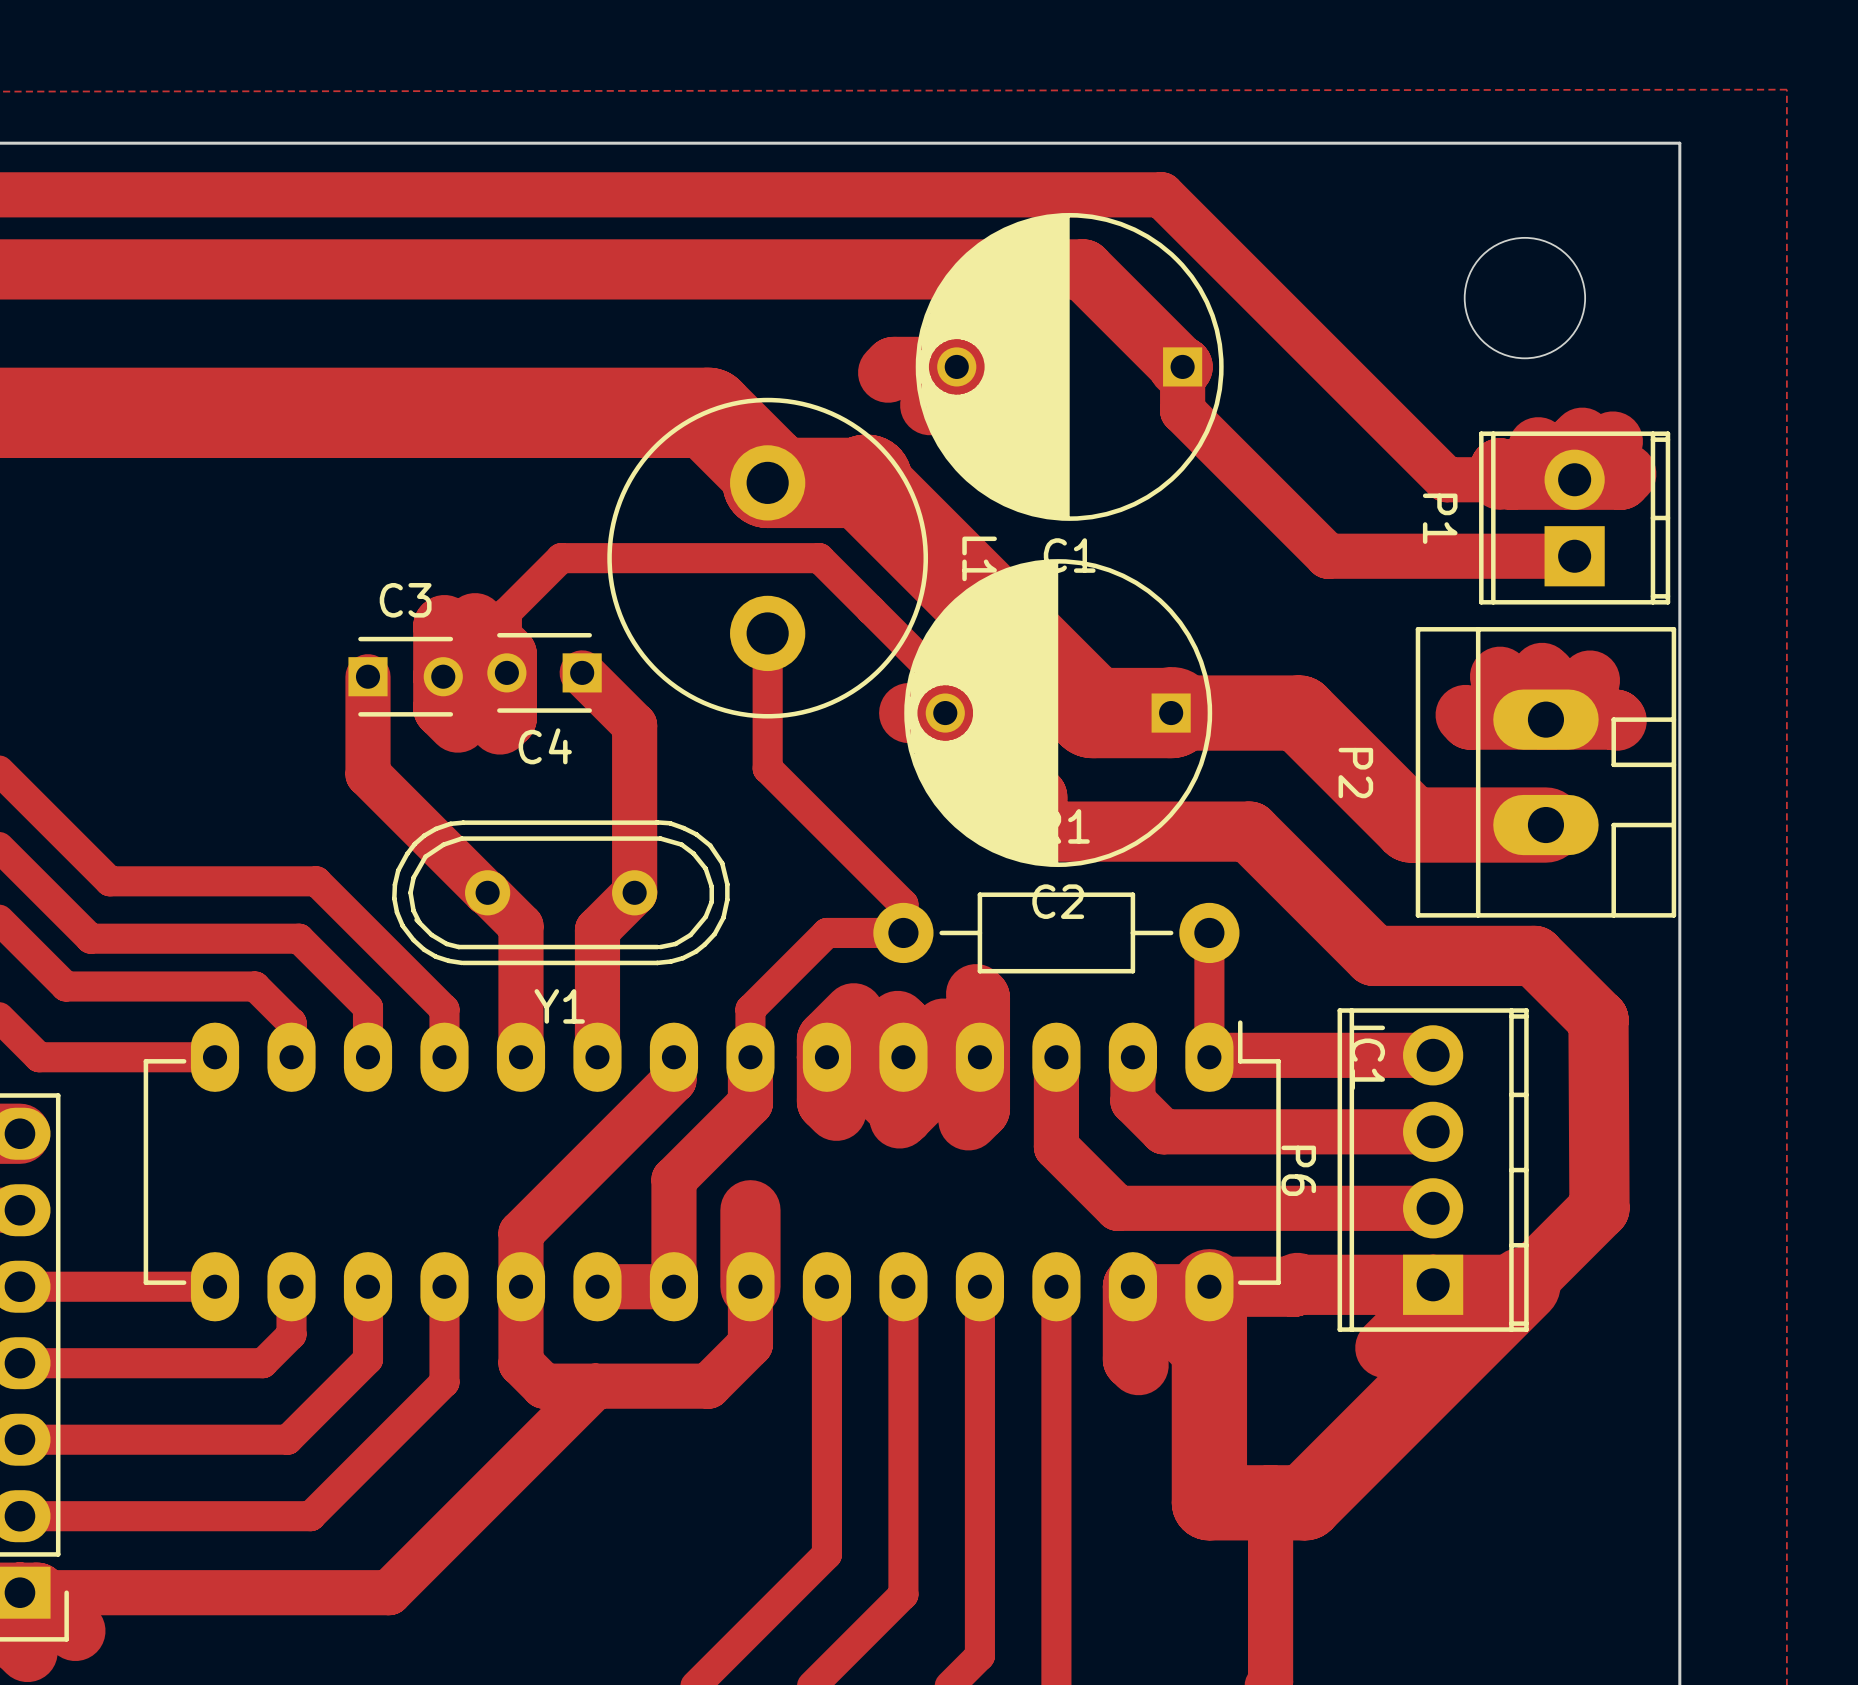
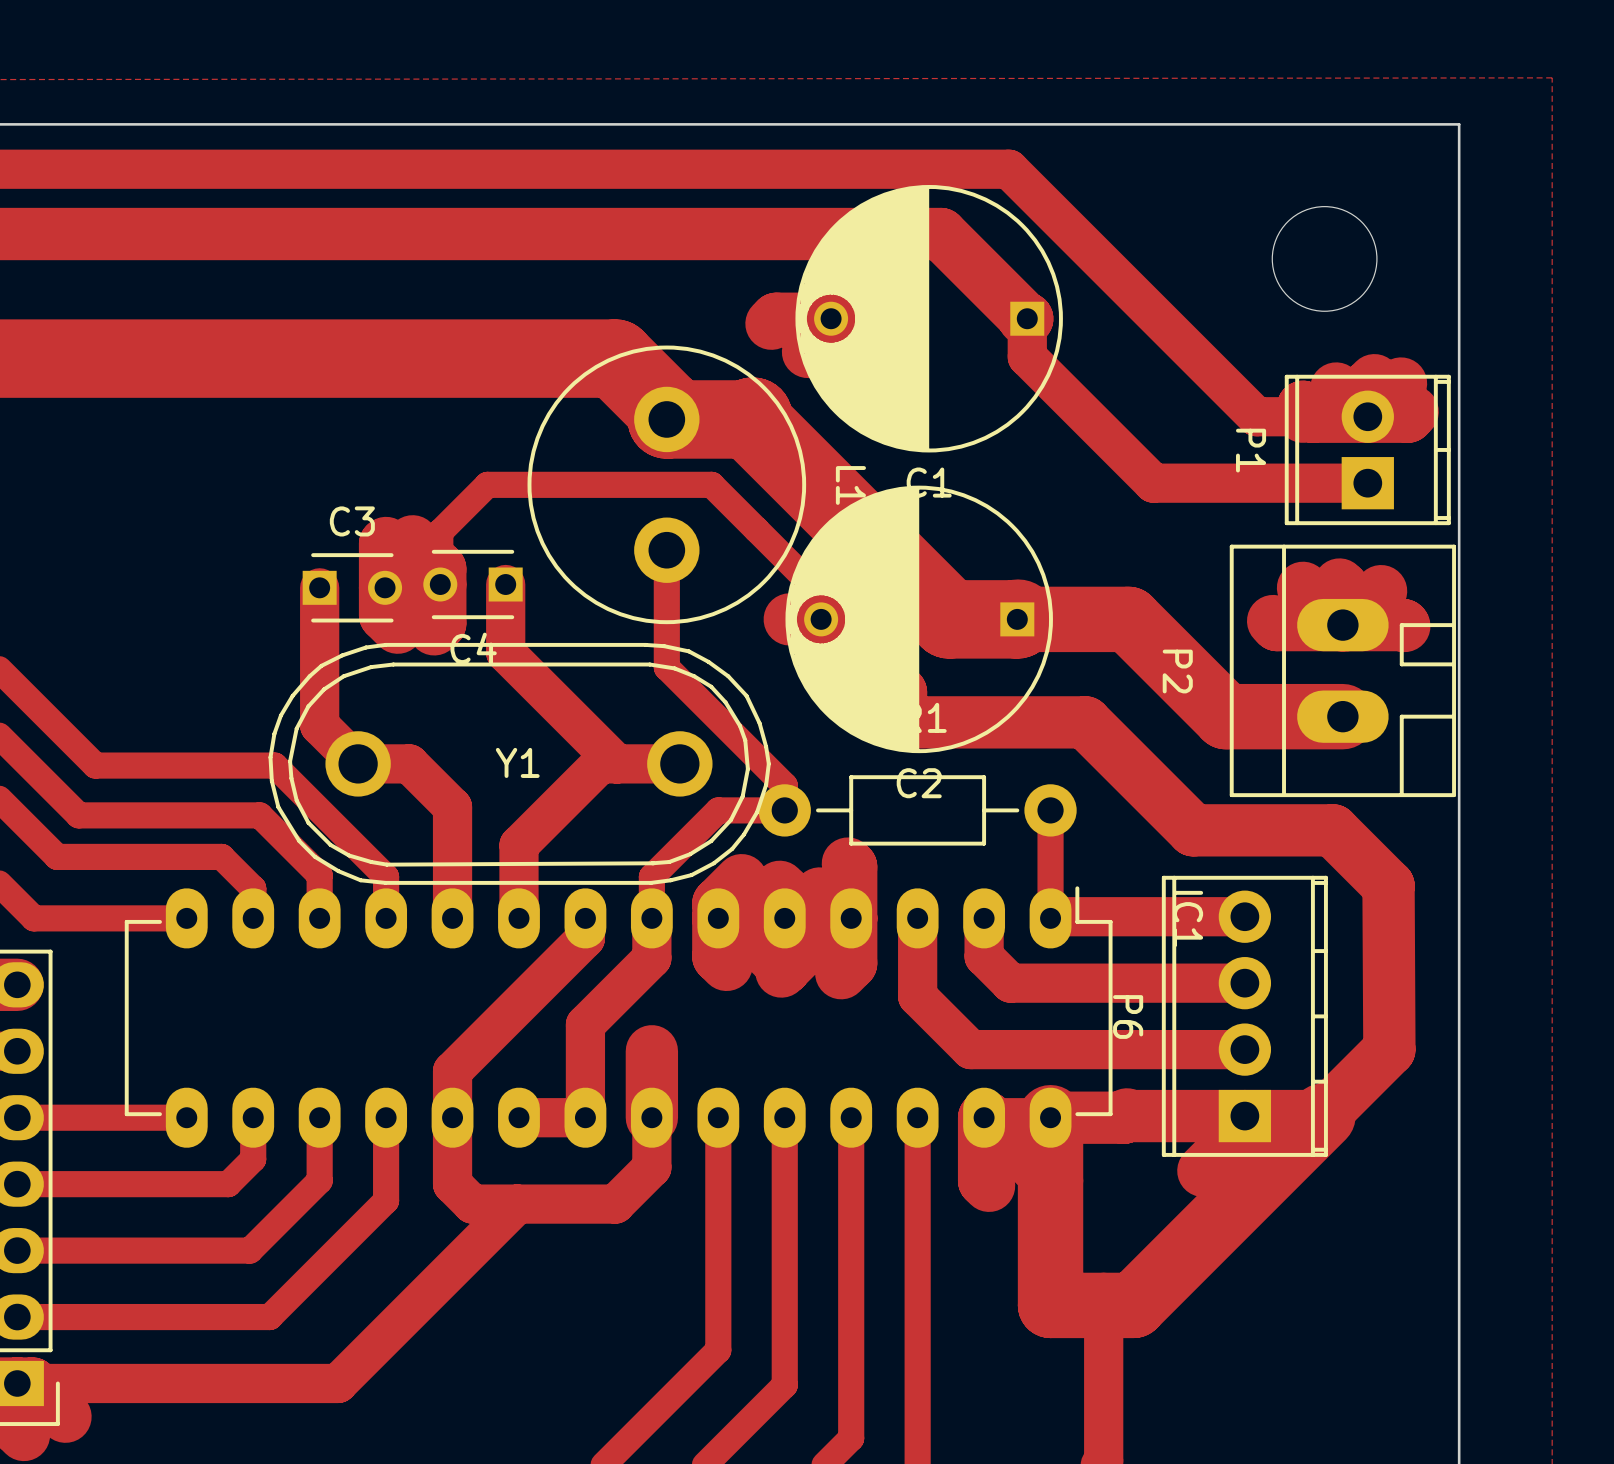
top track: (582, 672) (634, 725) (634, 892) (597, 929) (597, 973) -> (505, 584) (505, 652) (616, 763)
top track: (367, 774) (520, 926) (520, 929) -> (319, 672) (319, 725) (358, 763) (409, 763) (452, 807)
Y1 footprint: [392, 820, 730, 966] -> [268, 642, 771, 885]
top track: none -> (679, 763) (600, 763) (518, 845)
Y1 name position: Y1 (559, 1006) -> Y1 (517, 762)

